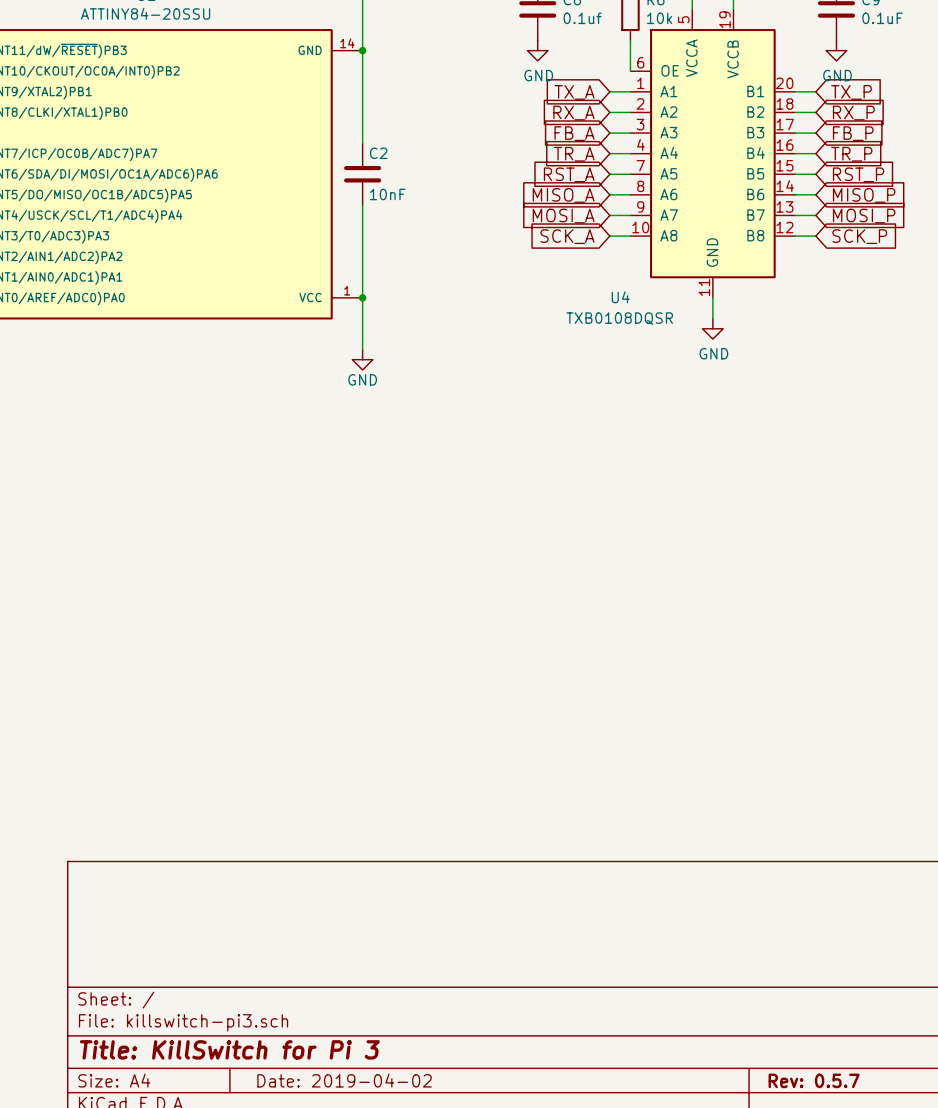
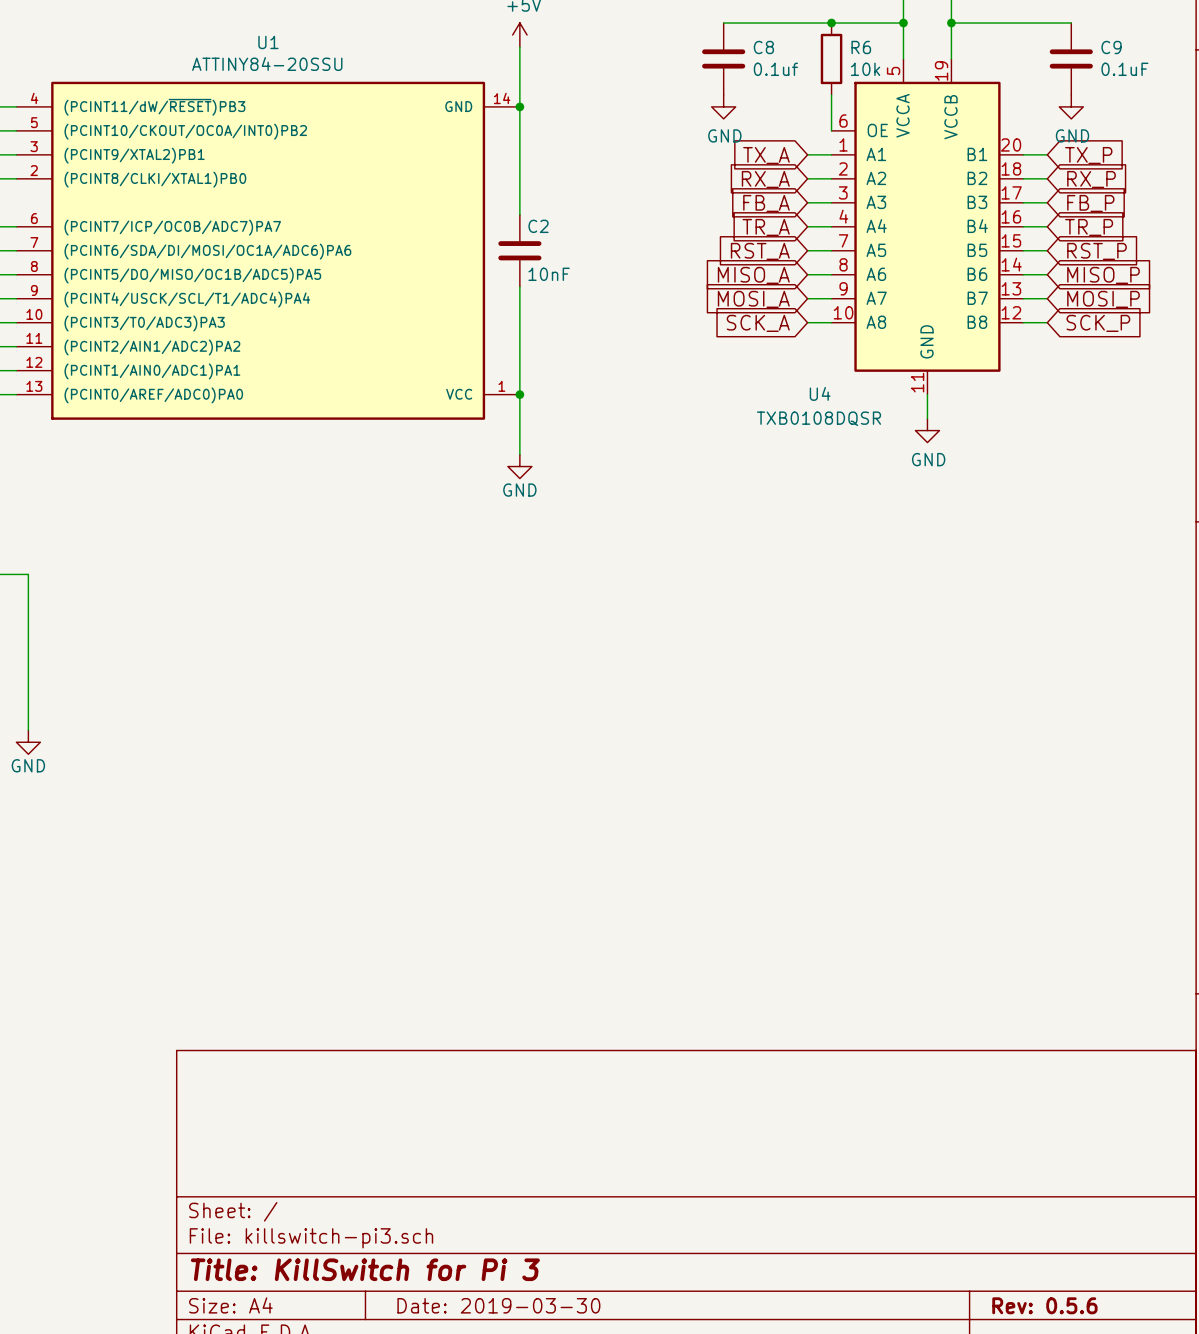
title block: Date: 2019-04-02 (344, 1080) -> Date: 2019-03-30 (498, 1305)
title block: Rev: 0.5.7 (814, 1080) -> Rev: 0.5.6 (1044, 1305)

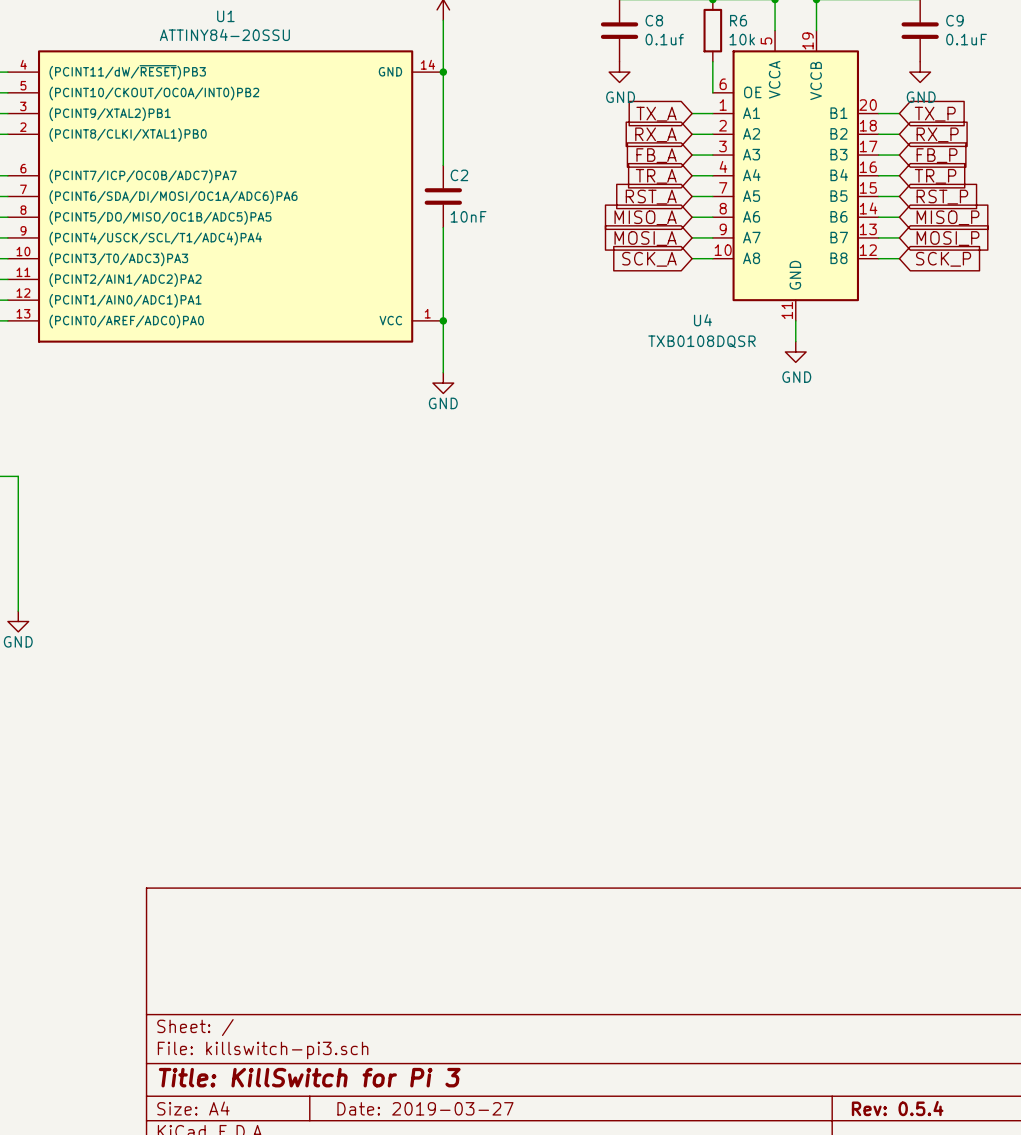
title block: Date: 2019-03-30 (498, 1305) -> Date: 2019-03-27 (425, 1108)
title block: Rev: 0.5.6 (1044, 1305) -> Rev: 0.5.4 (897, 1108)

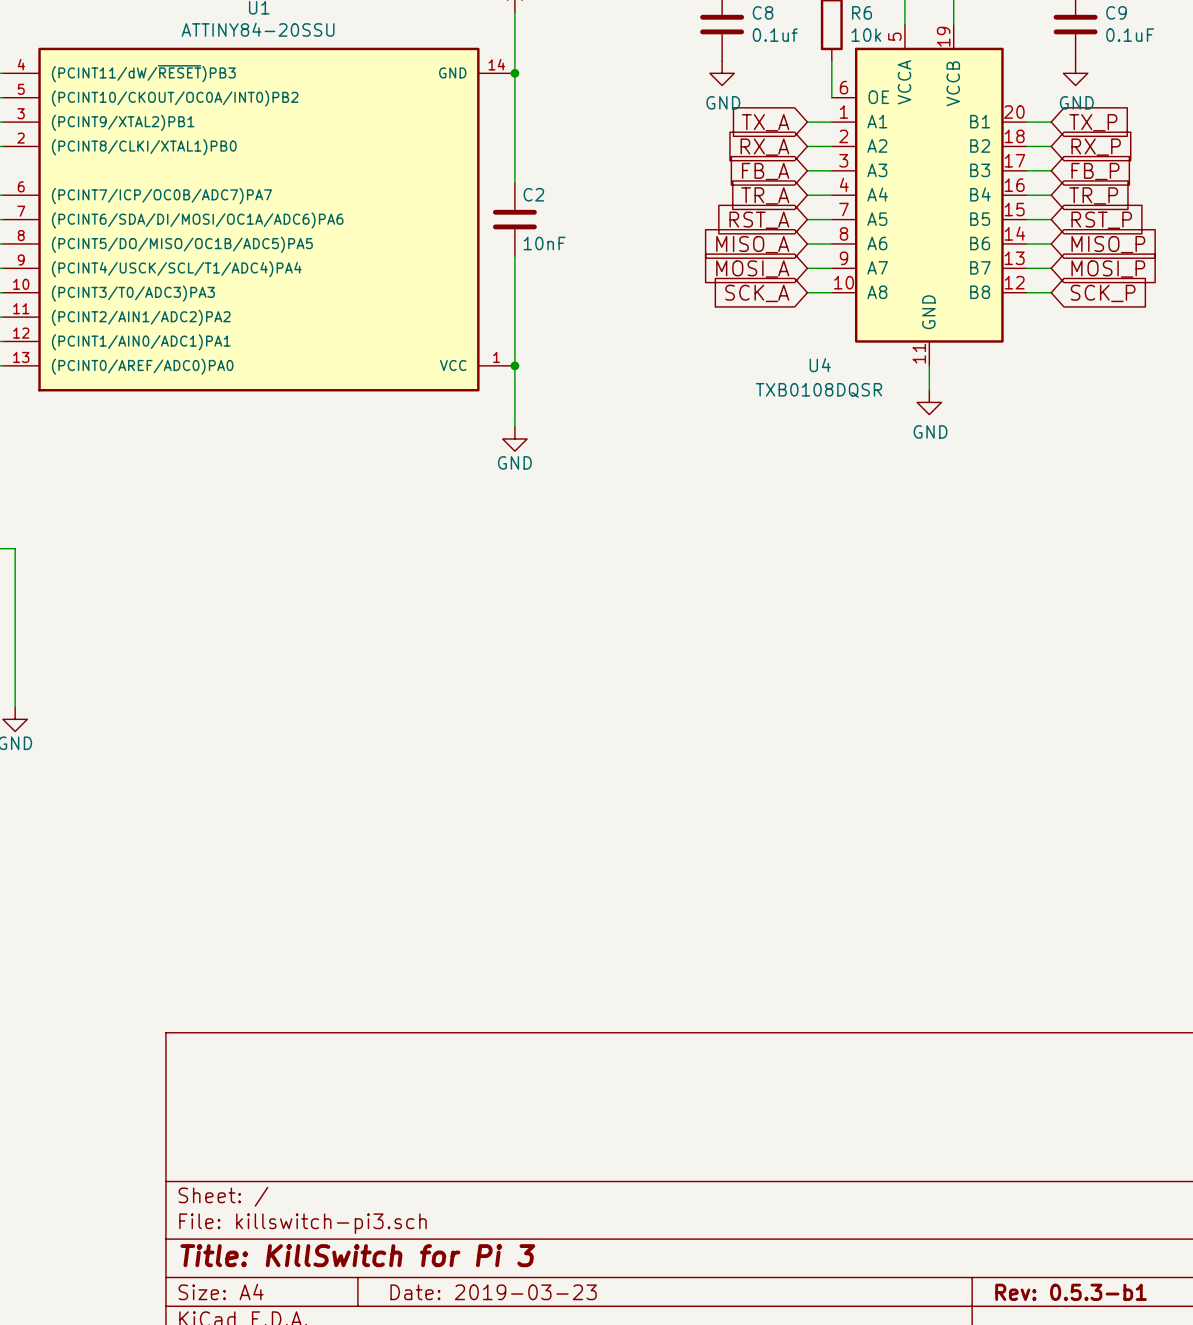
title block: Date: 2019-03-27 (425, 1108) -> Date: 2019-03-23 (493, 1292)
title block: Rev: 0.5.4 (897, 1108) -> Rev: 0.5.3-b1 (1071, 1292)

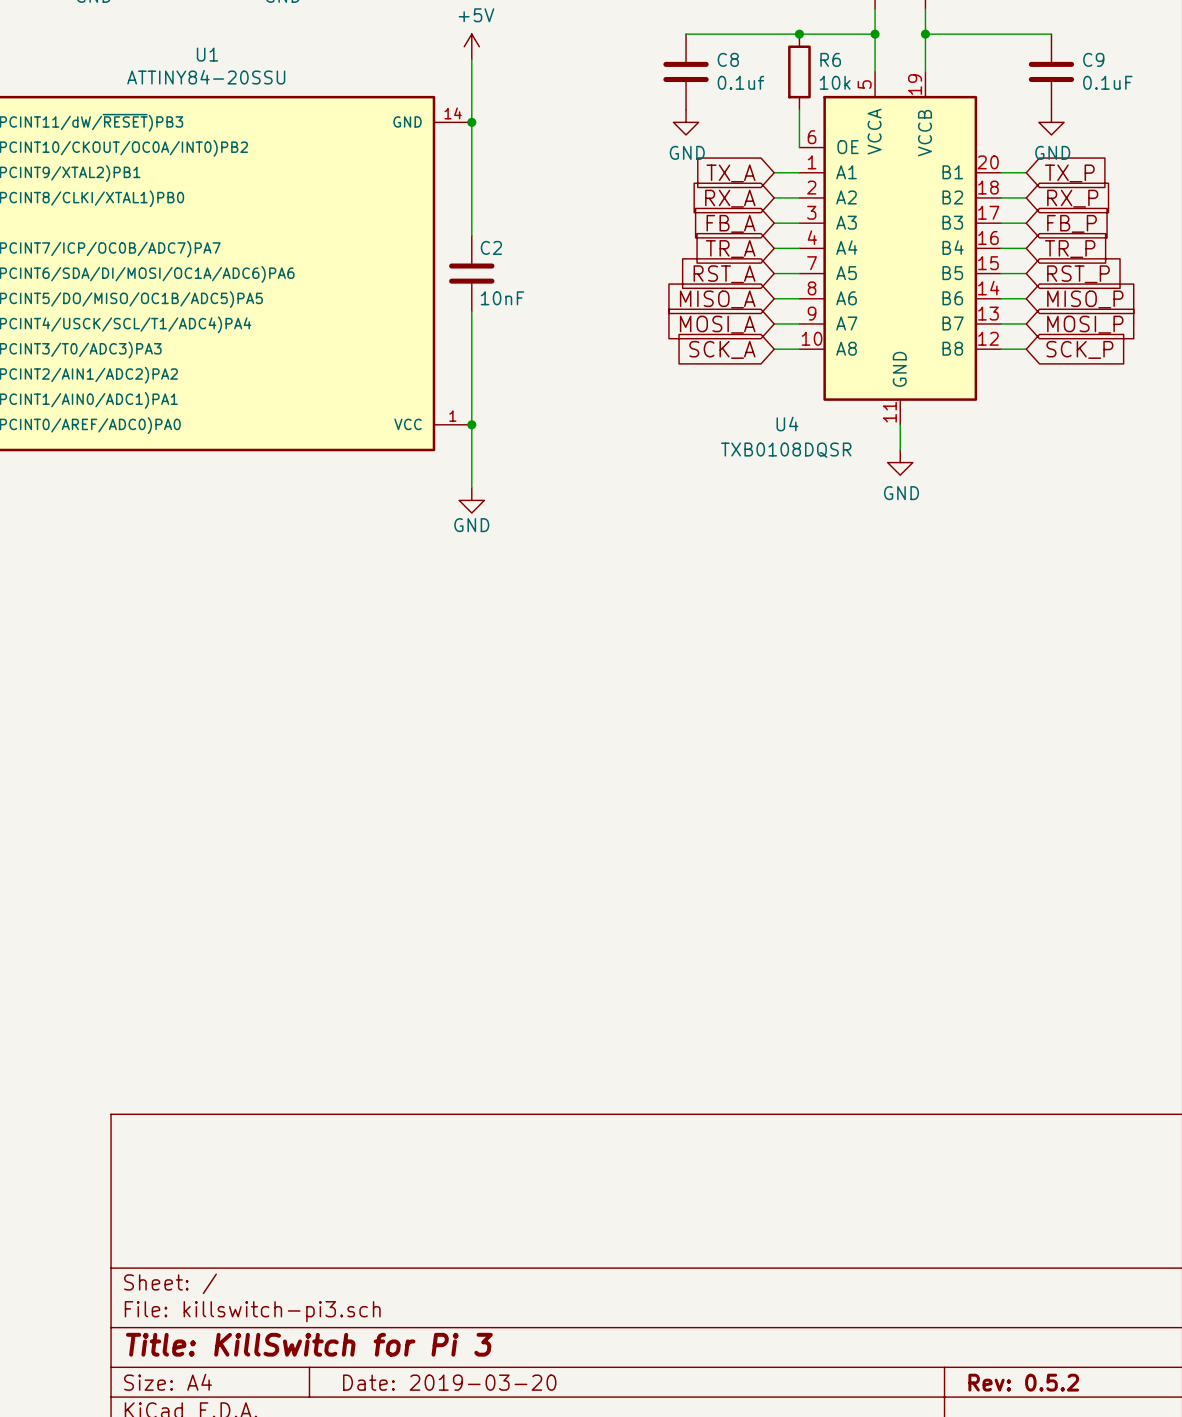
title block: Date: 2019-03-23 (493, 1292) -> Date: 2019-03-20 (449, 1382)
title block: Rev: 0.5.3-b1 (1071, 1292) -> Rev: 0.5.2 (1023, 1382)

